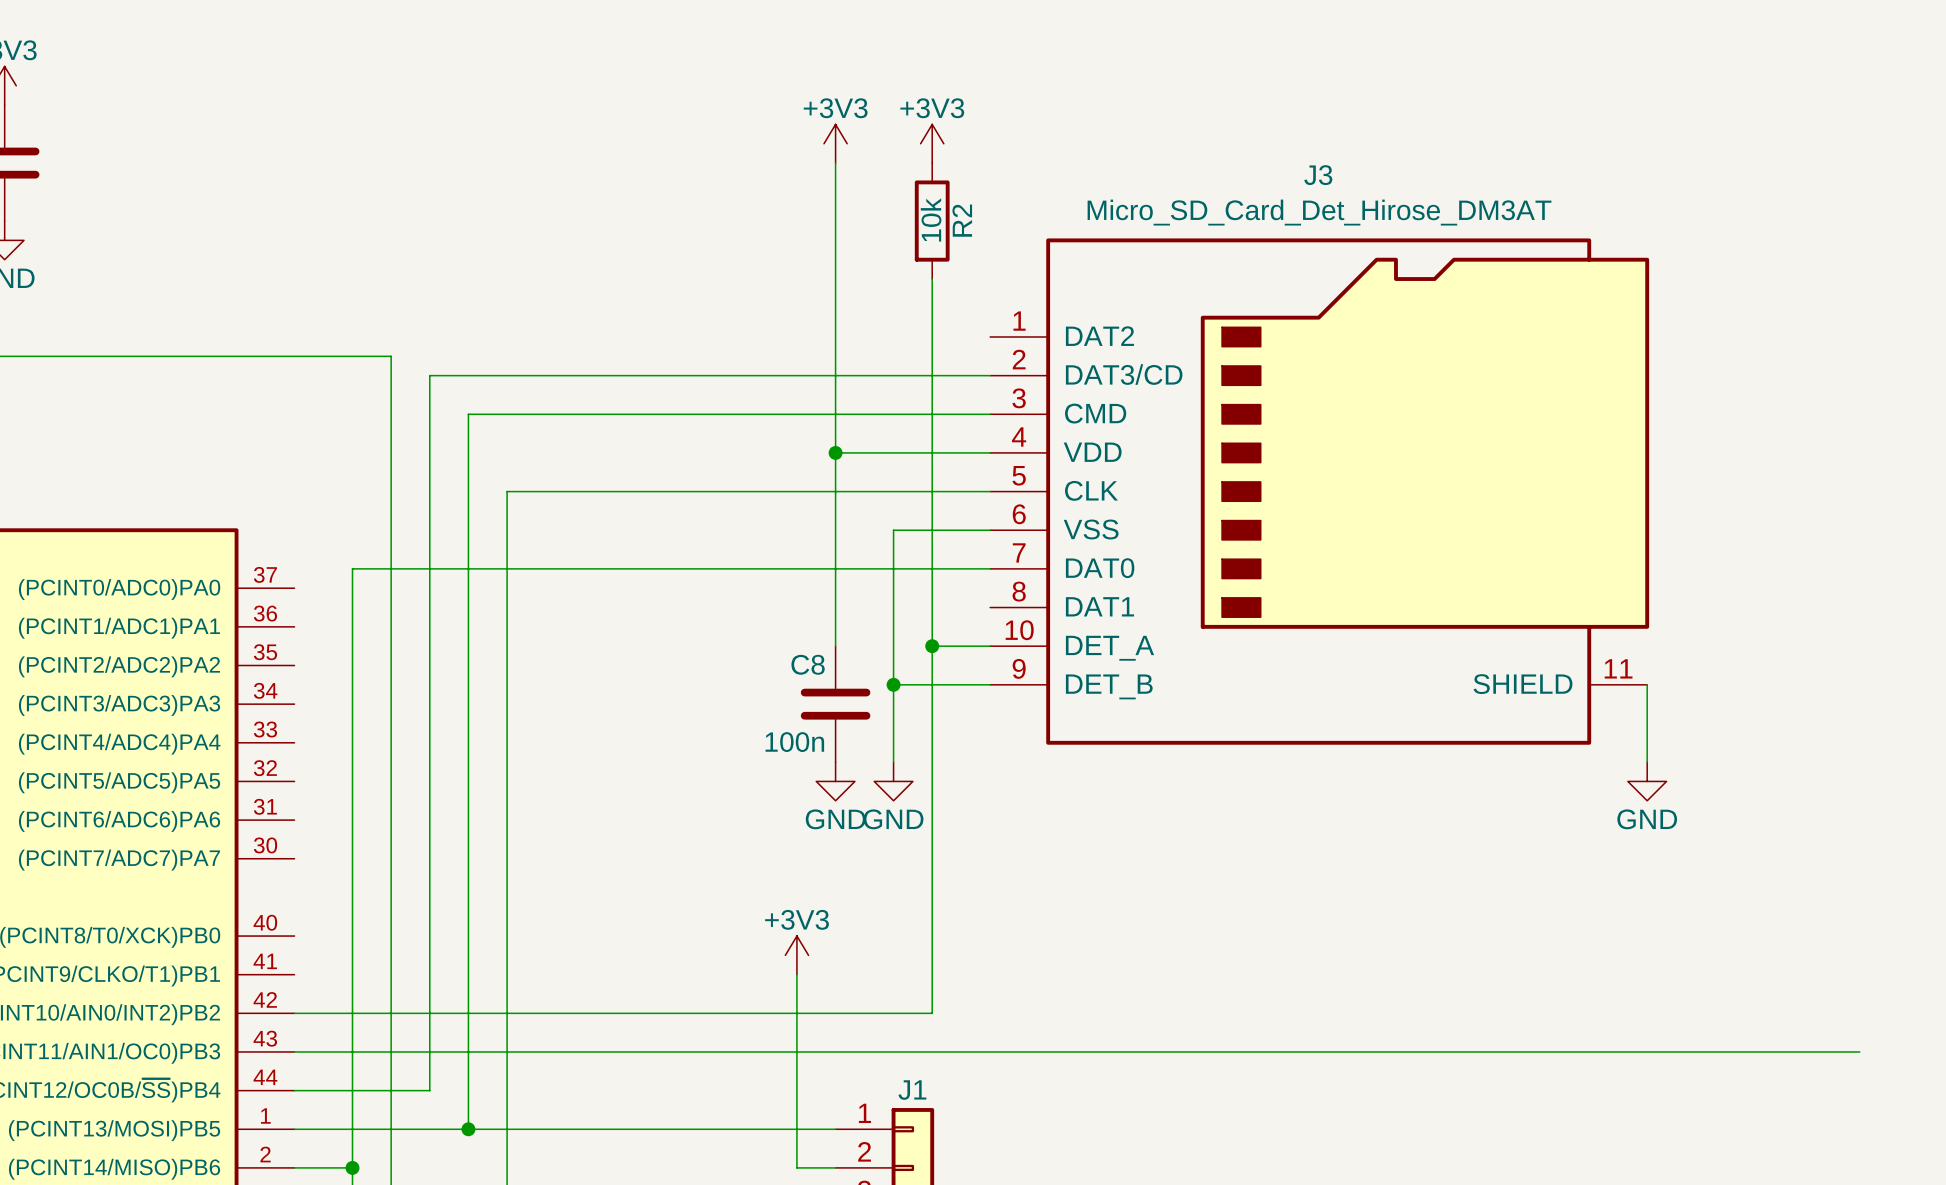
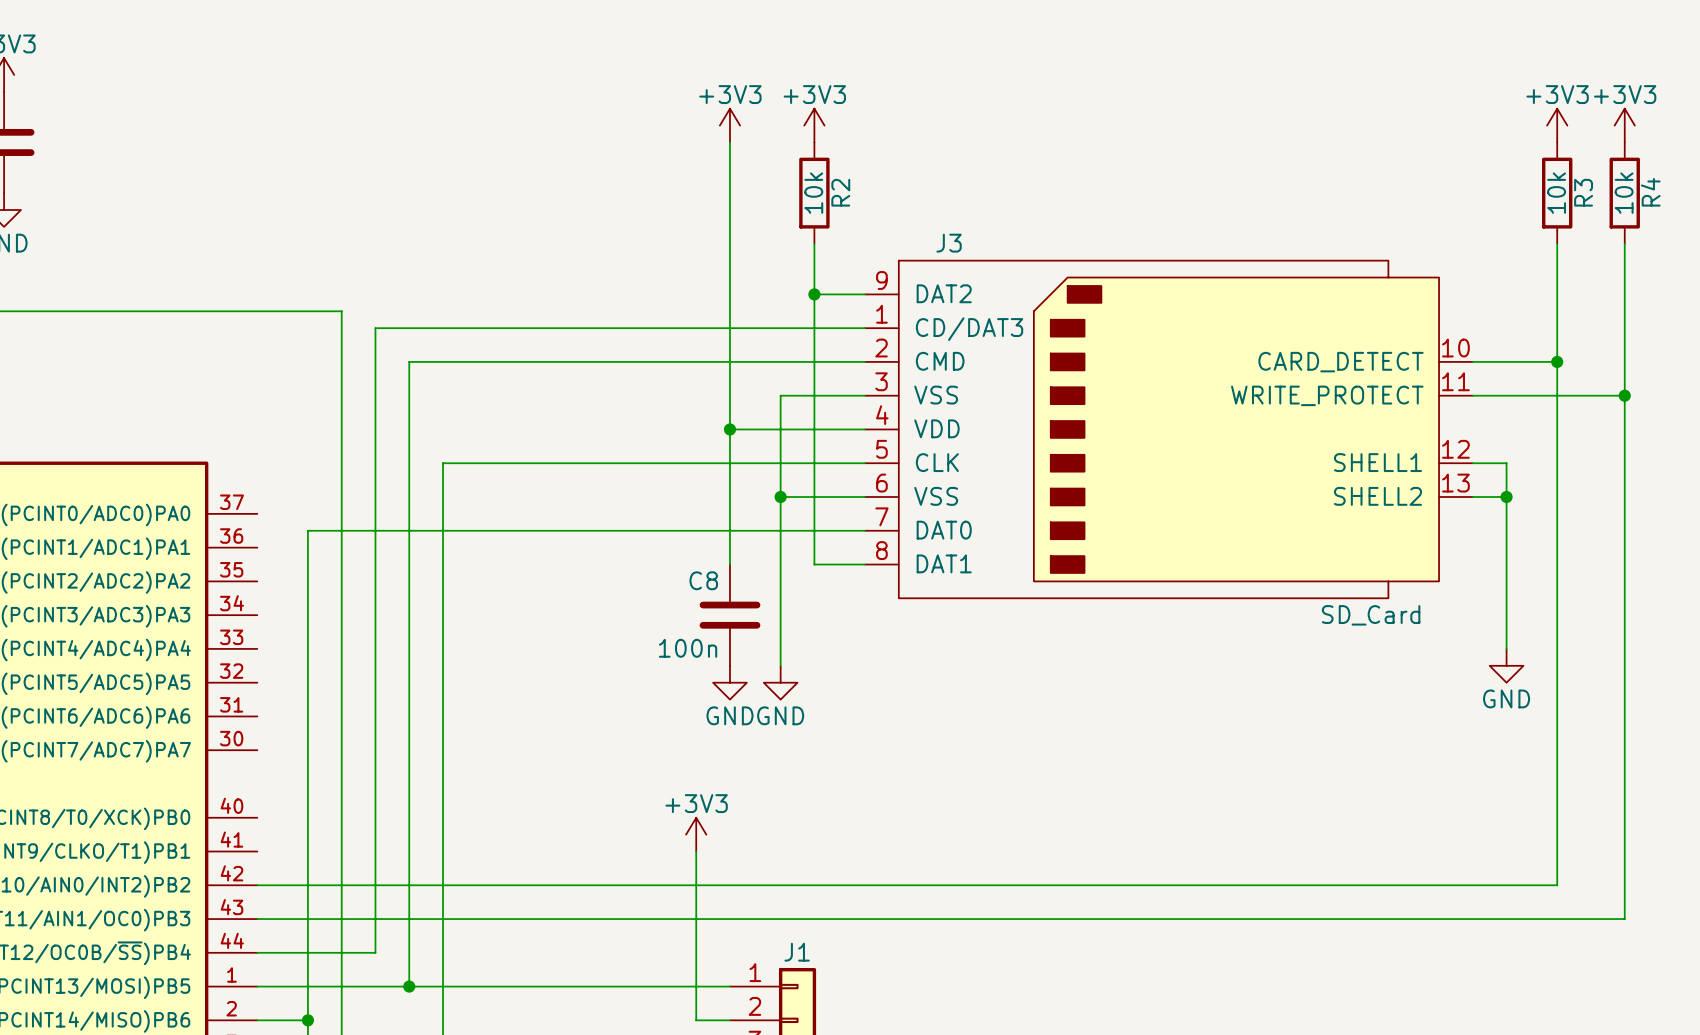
power symbol: none -> +3V3 (1557, 125)
power symbol: none -> +3V3 (1624, 125)
J3 name position: J3 (1318, 175) -> J3 (949, 243)
J3 value: Micro_SD_Card_Det_Hirose_DM3AT (1319, 212) -> SD_Card (1371, 615)
R3: none -> 10k (1557, 193)
R4: none -> 10k (1624, 193)
J3 symbol: [990, 238, 1650, 745] -> [865, 260, 1473, 599]
wire: none -> (1624, 243) (1624, 919)
junction: none -> (814, 294)
wire: none -> (1472, 361) (1557, 361)
junction: none -> (1557, 361)
wire: (835, 452) (893, 452) -> (814, 294) (865, 294)
junction position: (835, 452) -> (729, 429)
wire: none -> (1472, 395) (1624, 395)
junction: none -> (1624, 395)
wire: (835, 491) (507, 491) (507, 530) -> (780, 395) (780, 463) (443, 463)
wire: none -> (1472, 463) (1506, 463) (1506, 648)
wire: (893, 568) (352, 568) (352, 607) -> (865, 530) (307, 530)
junction: none -> (780, 496)
wire: none -> (1472, 496) (1506, 496)
junction: none -> (1506, 496)
wire: (932, 646) (932, 1013) -> (1557, 243) (1557, 885) (814, 885)
junction: (932, 646) -> none
wire: (893, 684) (990, 684) -> none
junction: (893, 684) -> none
wire: (1647, 684) (1647, 762) -> none
power symbol position: GND (1647, 781) -> GND (1506, 665)

